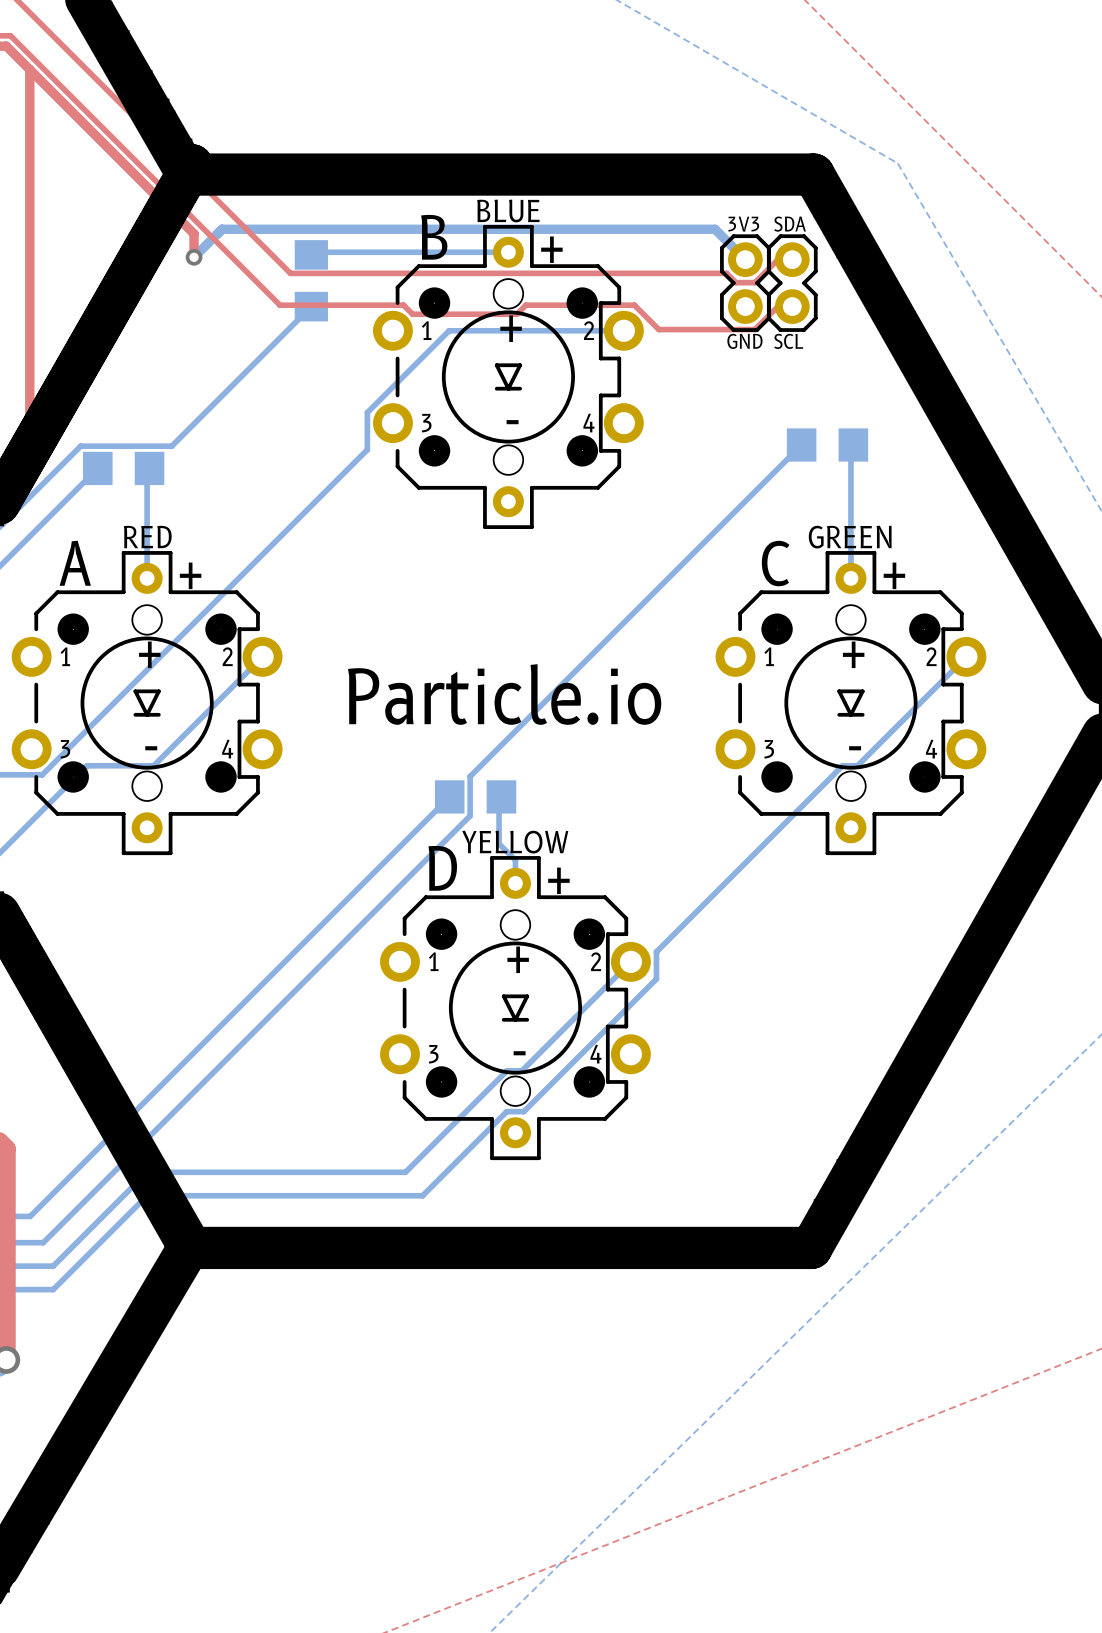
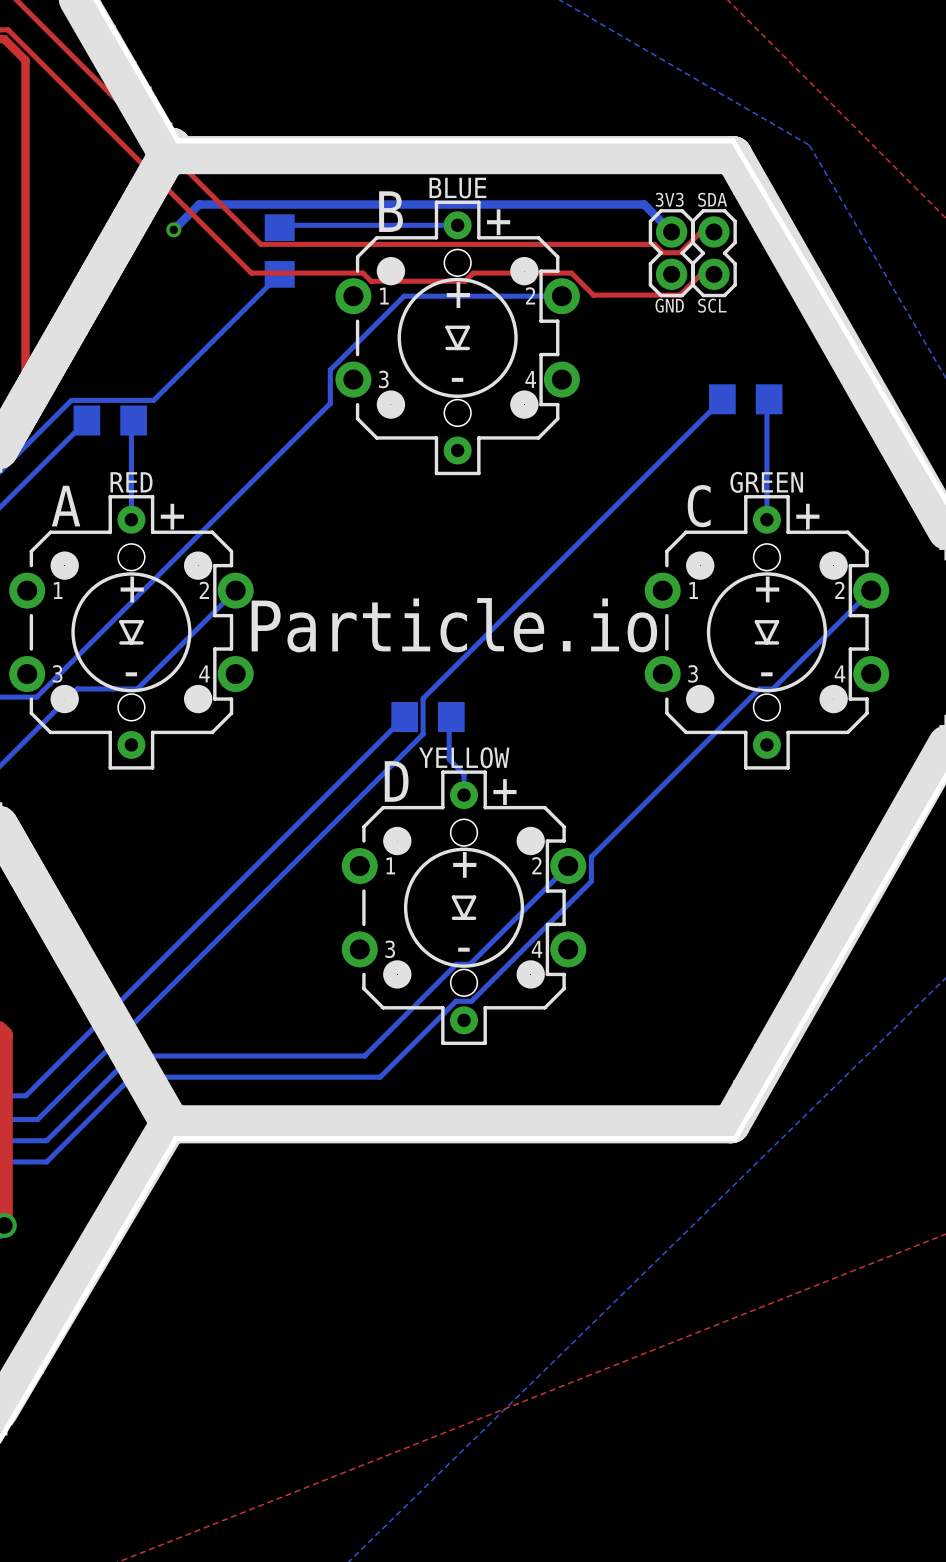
top track: (29, 69) (194, 233) (194, 257) -> none

